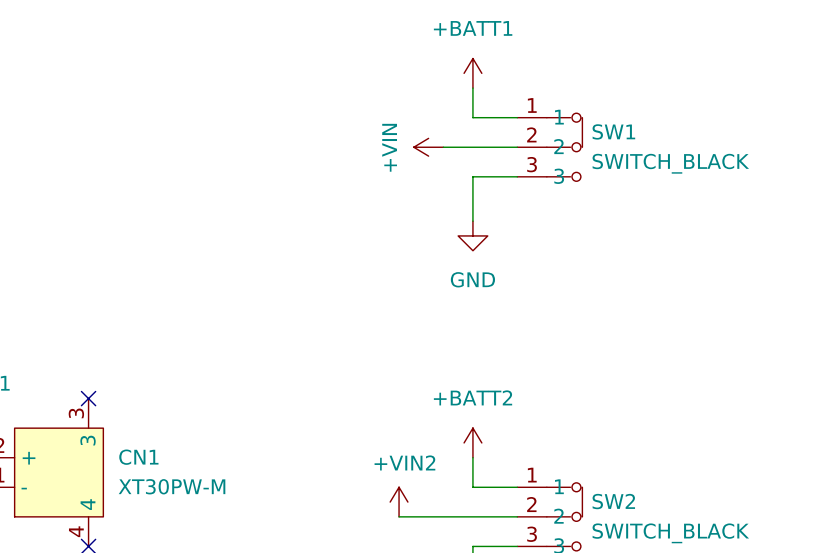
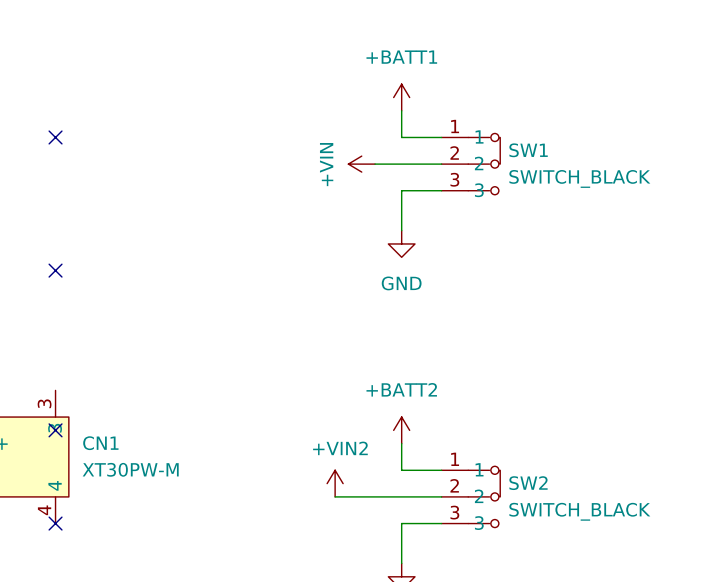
no-connect mark: none -> (55, 137)
no-connect mark: none -> (55, 270)
no-connect mark position: (88, 398) -> (55, 430)

